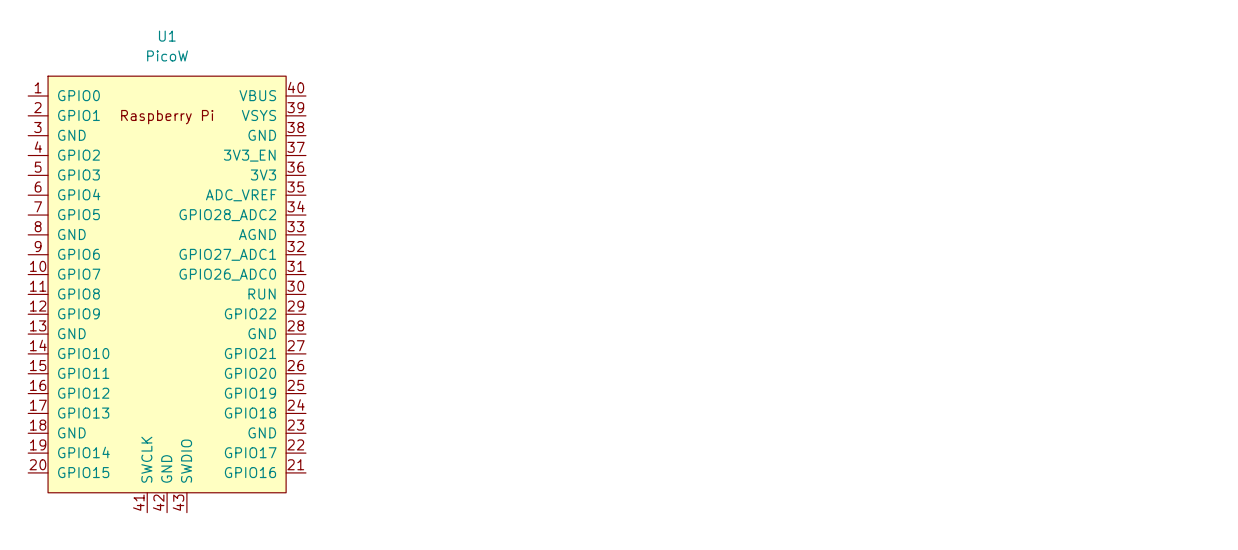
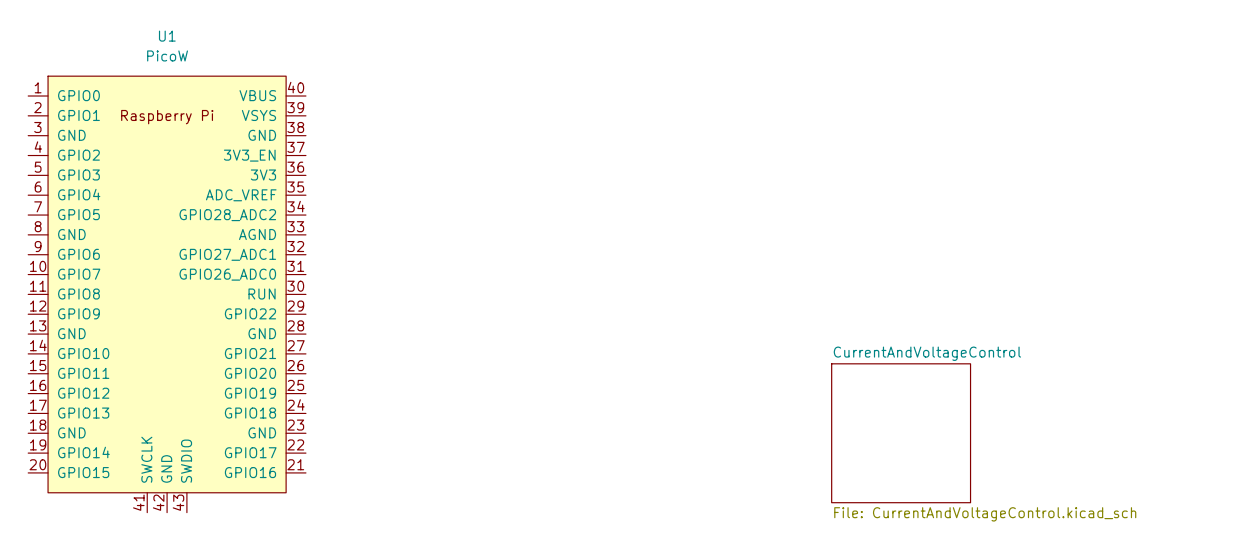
sheet CurrentAndVoltageControl: none -> File: CurrentAndVoltageControl.kicad_sch (901, 433)

